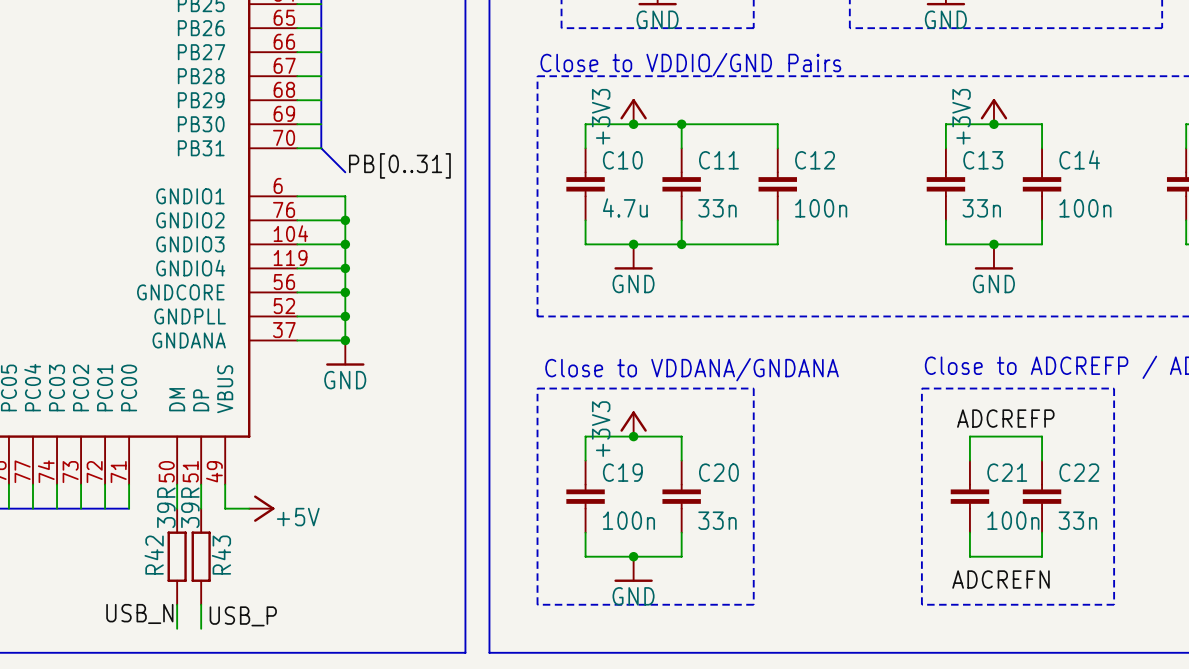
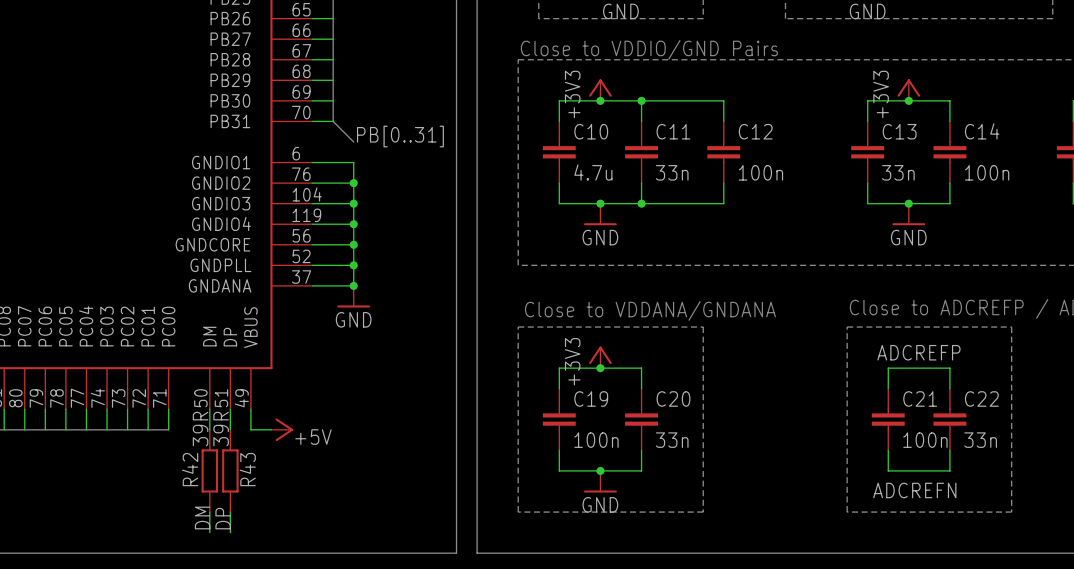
label: none -> DM (202, 517)
label: USB_N (139, 613) -> none
label: USB_P (243, 616) -> DP (223, 518)

